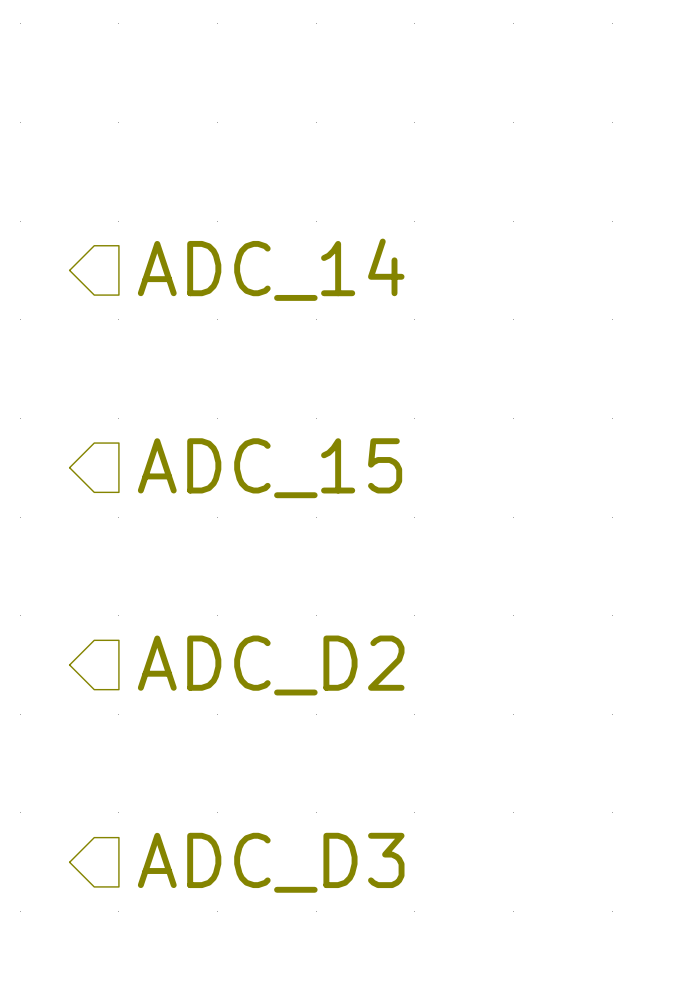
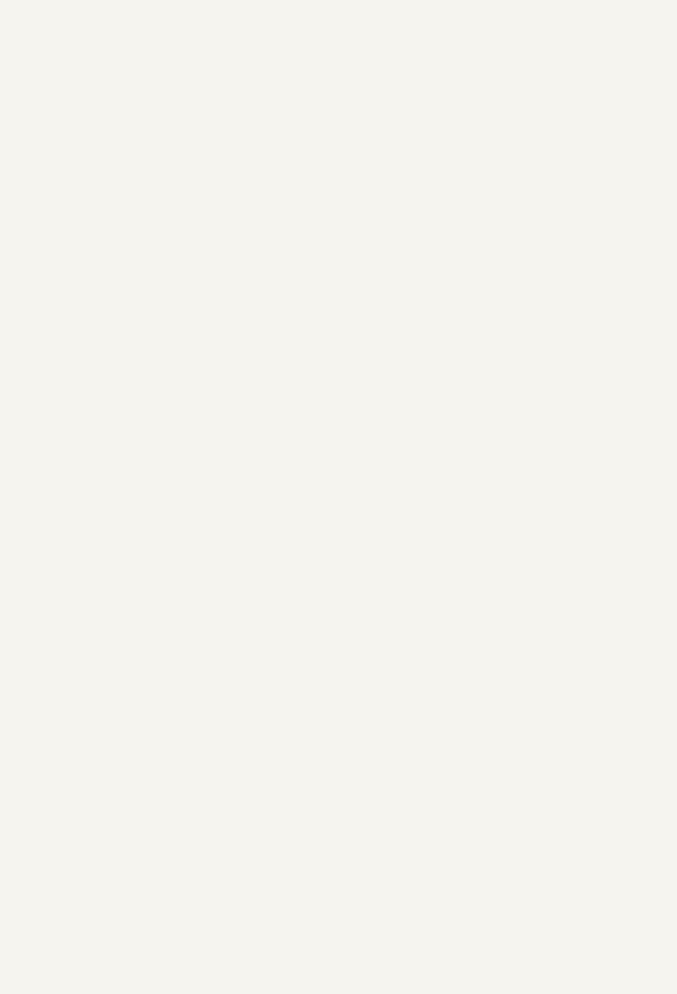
hierarchical label: ADC_14 (271, 269) -> none
hierarchical label: ADC_15 (270, 468) -> none
hierarchical label: ADC_D2 (271, 665) -> none
hierarchical label: ADC_D3 (271, 862) -> none

